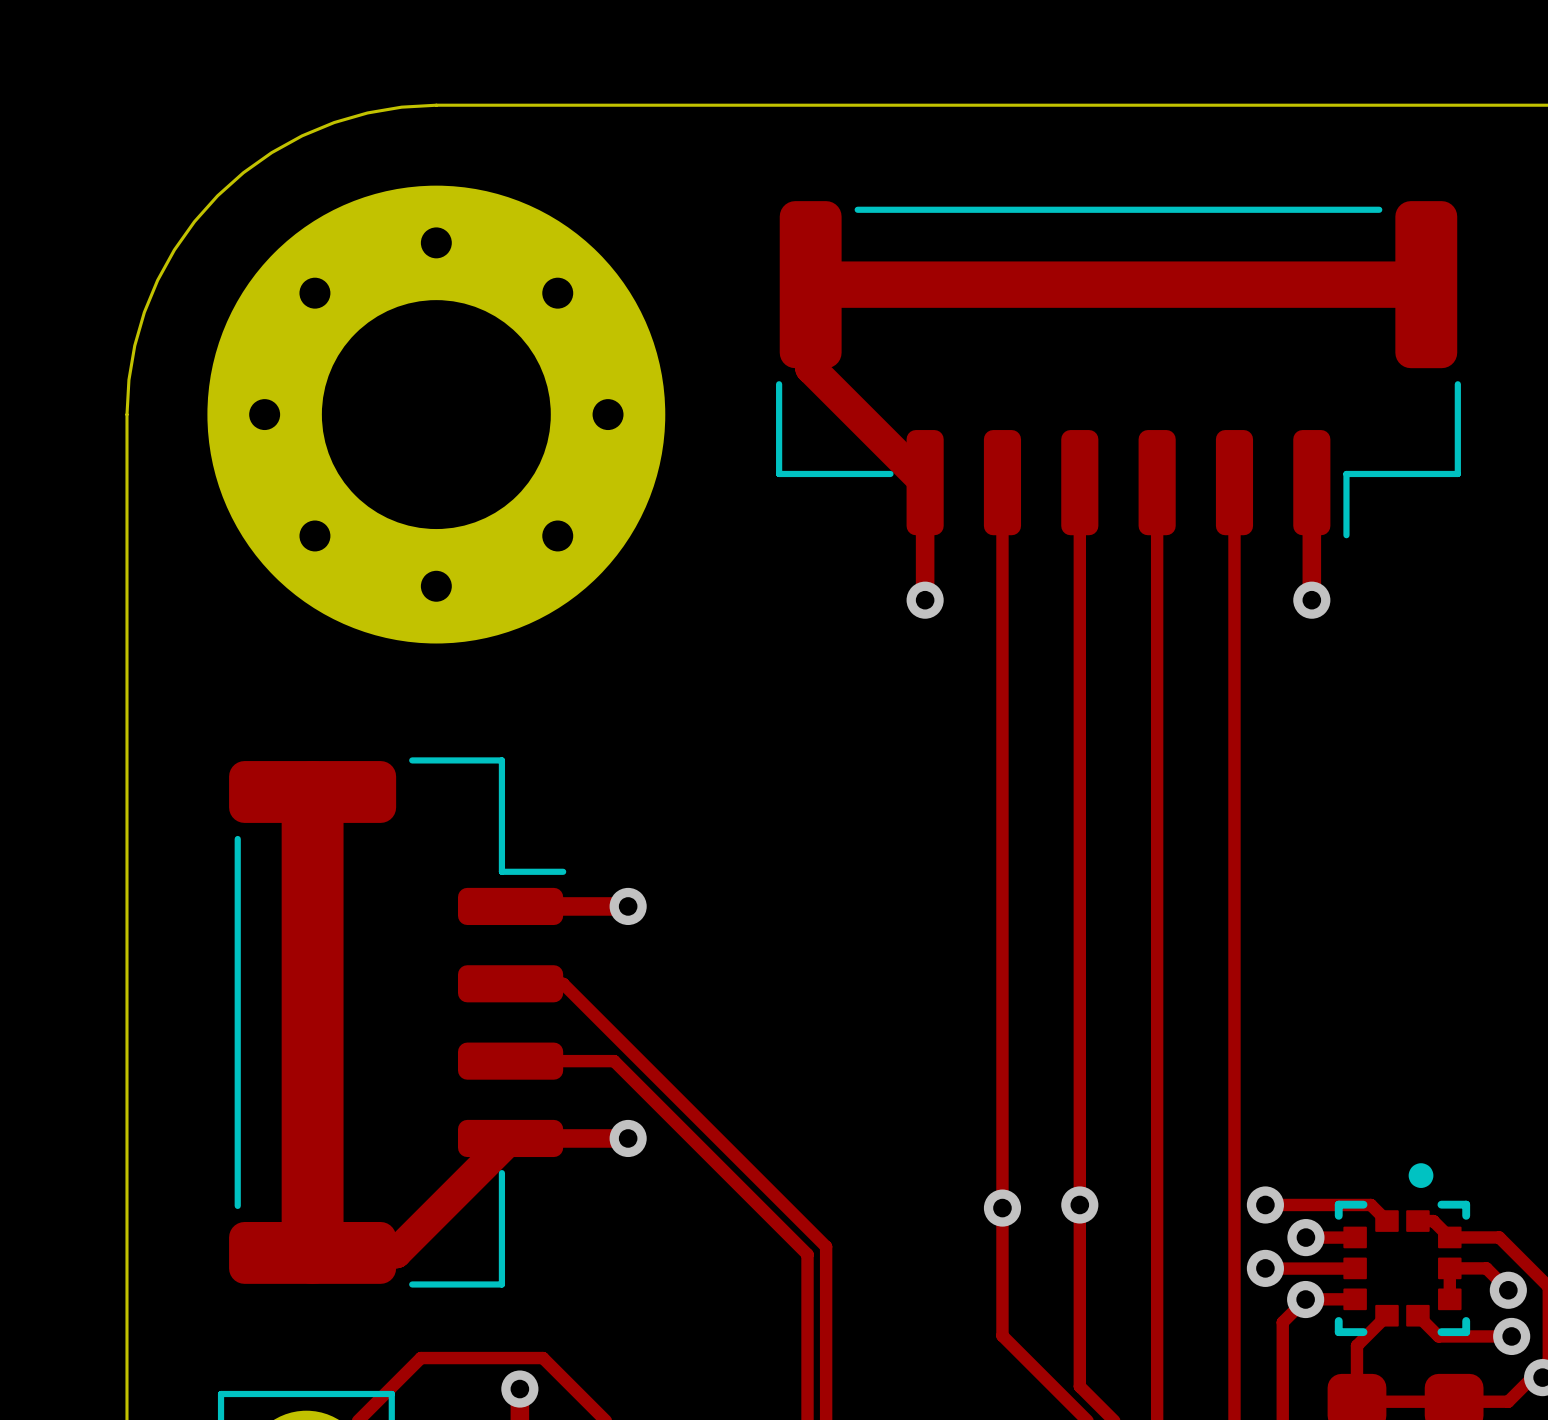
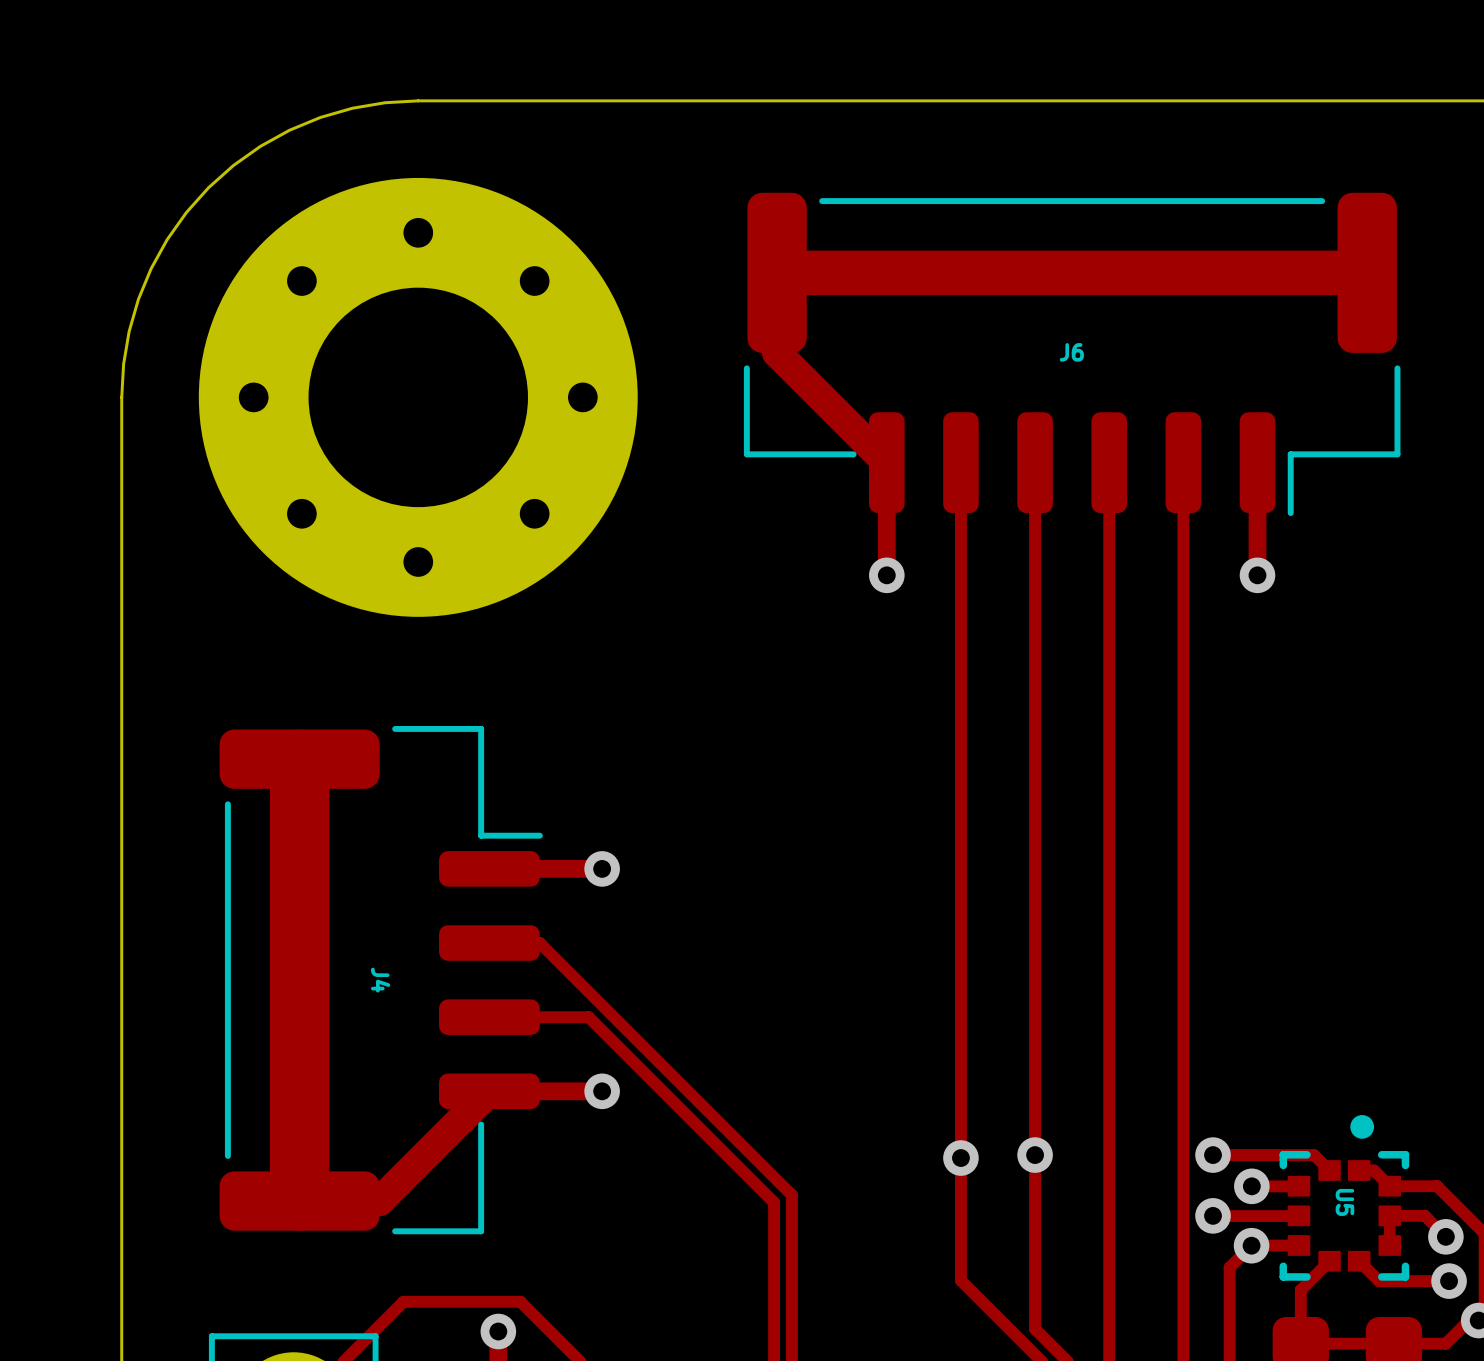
J6 name: none -> J6 (1071, 352)
J4 name: none -> J4 (380, 980)
U5 name: none -> U5 (1344, 1202)

